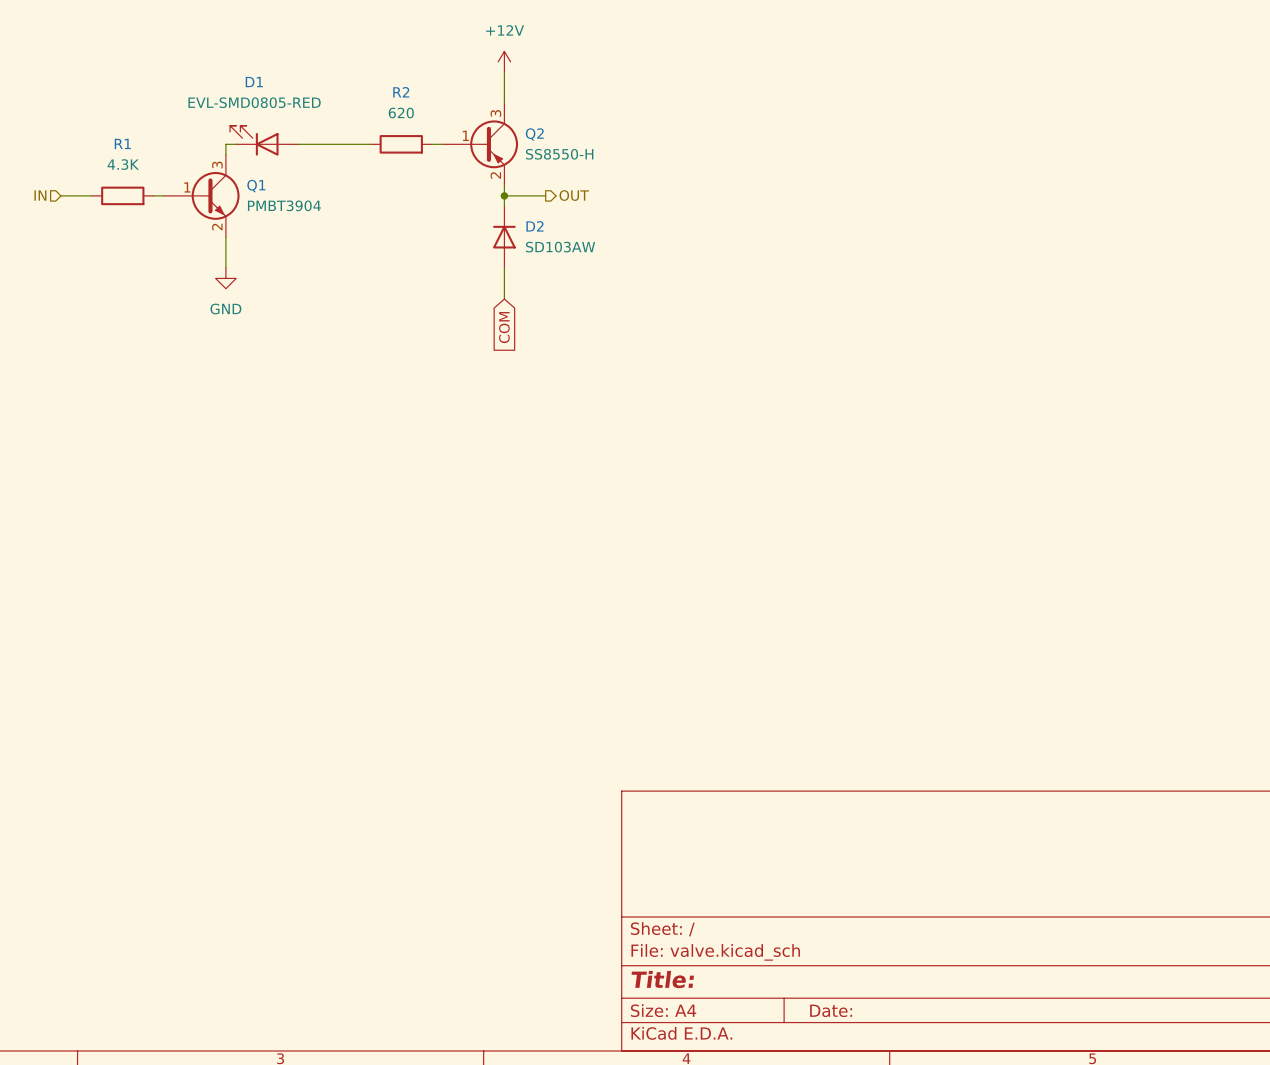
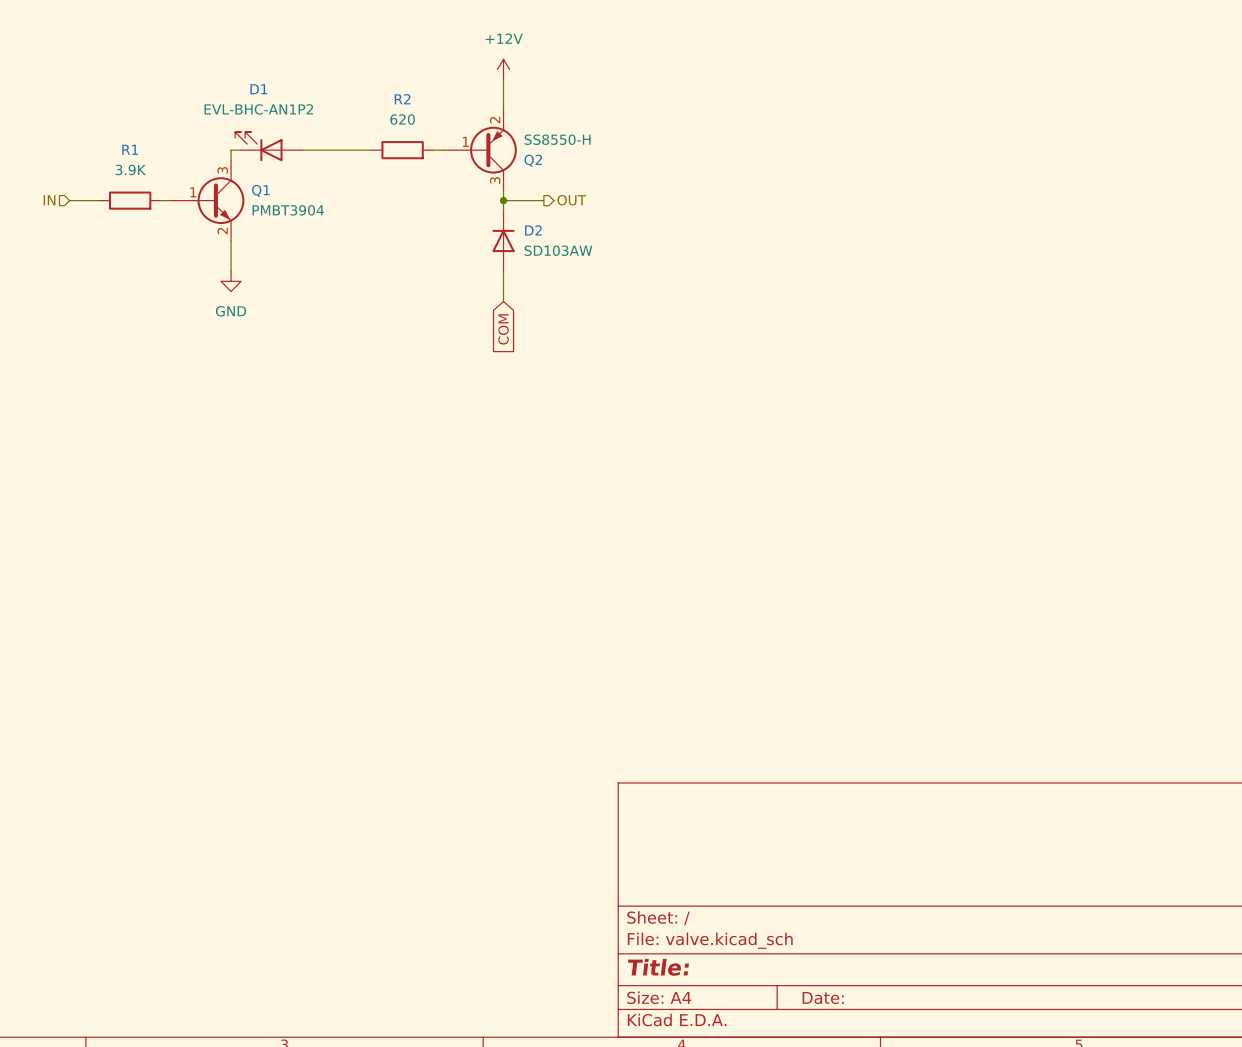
D1 value: EVL-SMD0805-RED (254, 102) -> EVL-BHC-AN1P2 (258, 109)
Q2 flip: as is (494, 144) -> up-down (493, 150)
R1 value: 4.3K (123, 164) -> 3.9K (130, 169)

